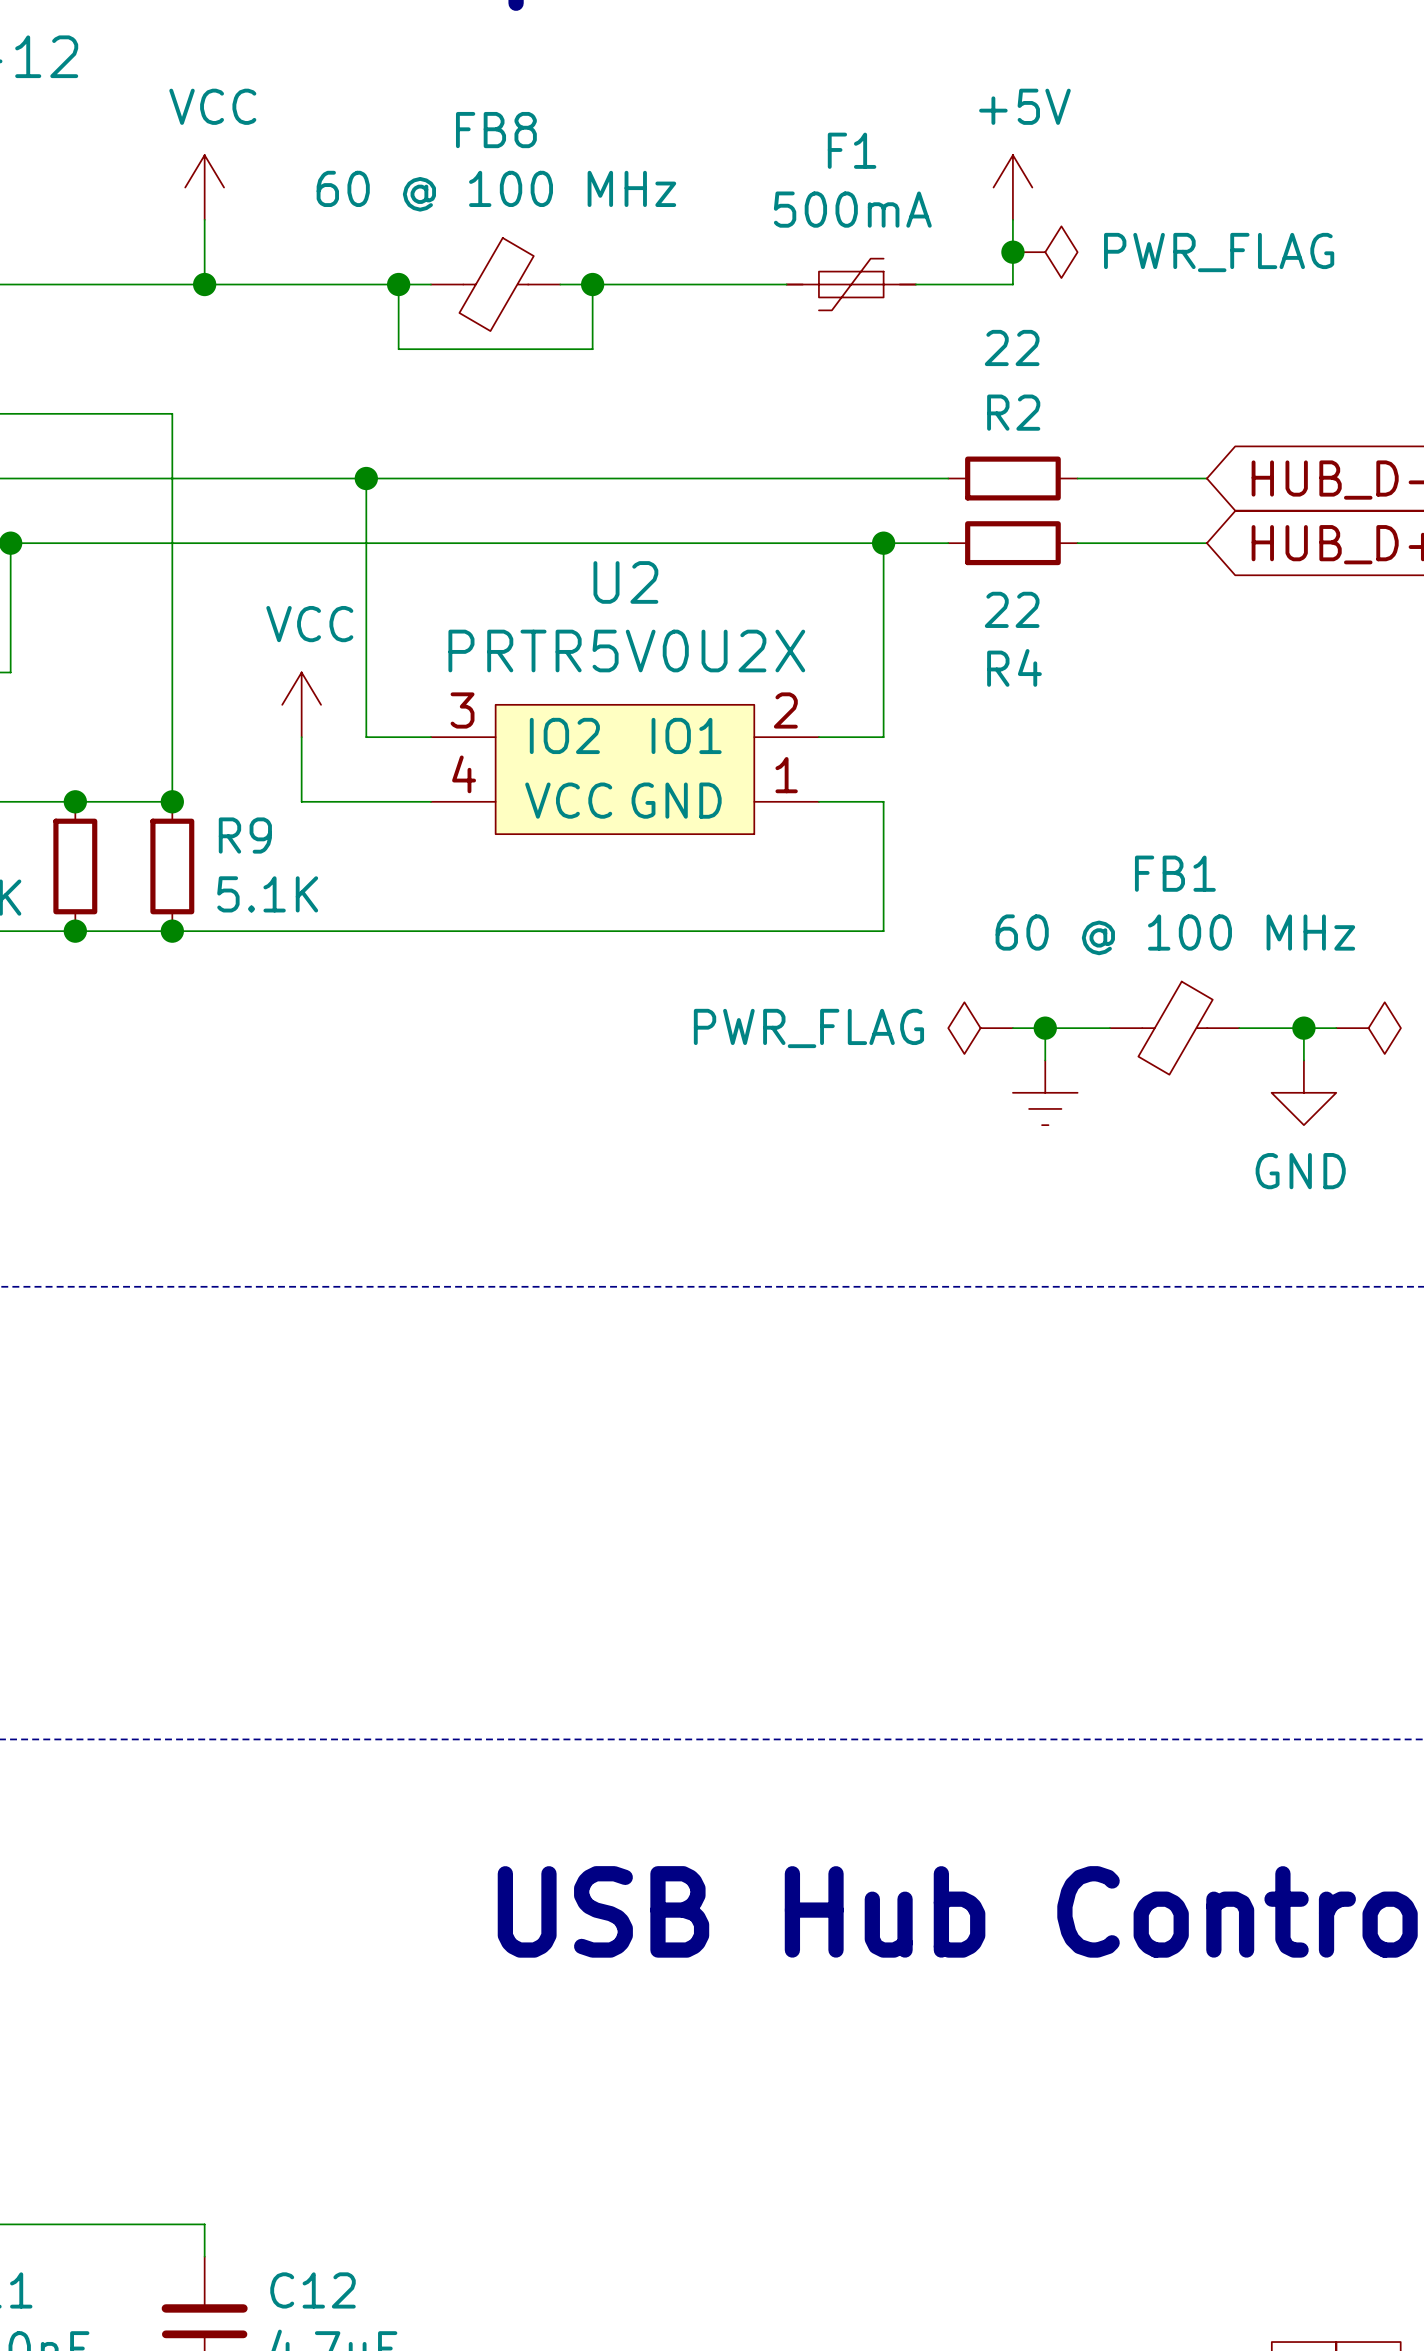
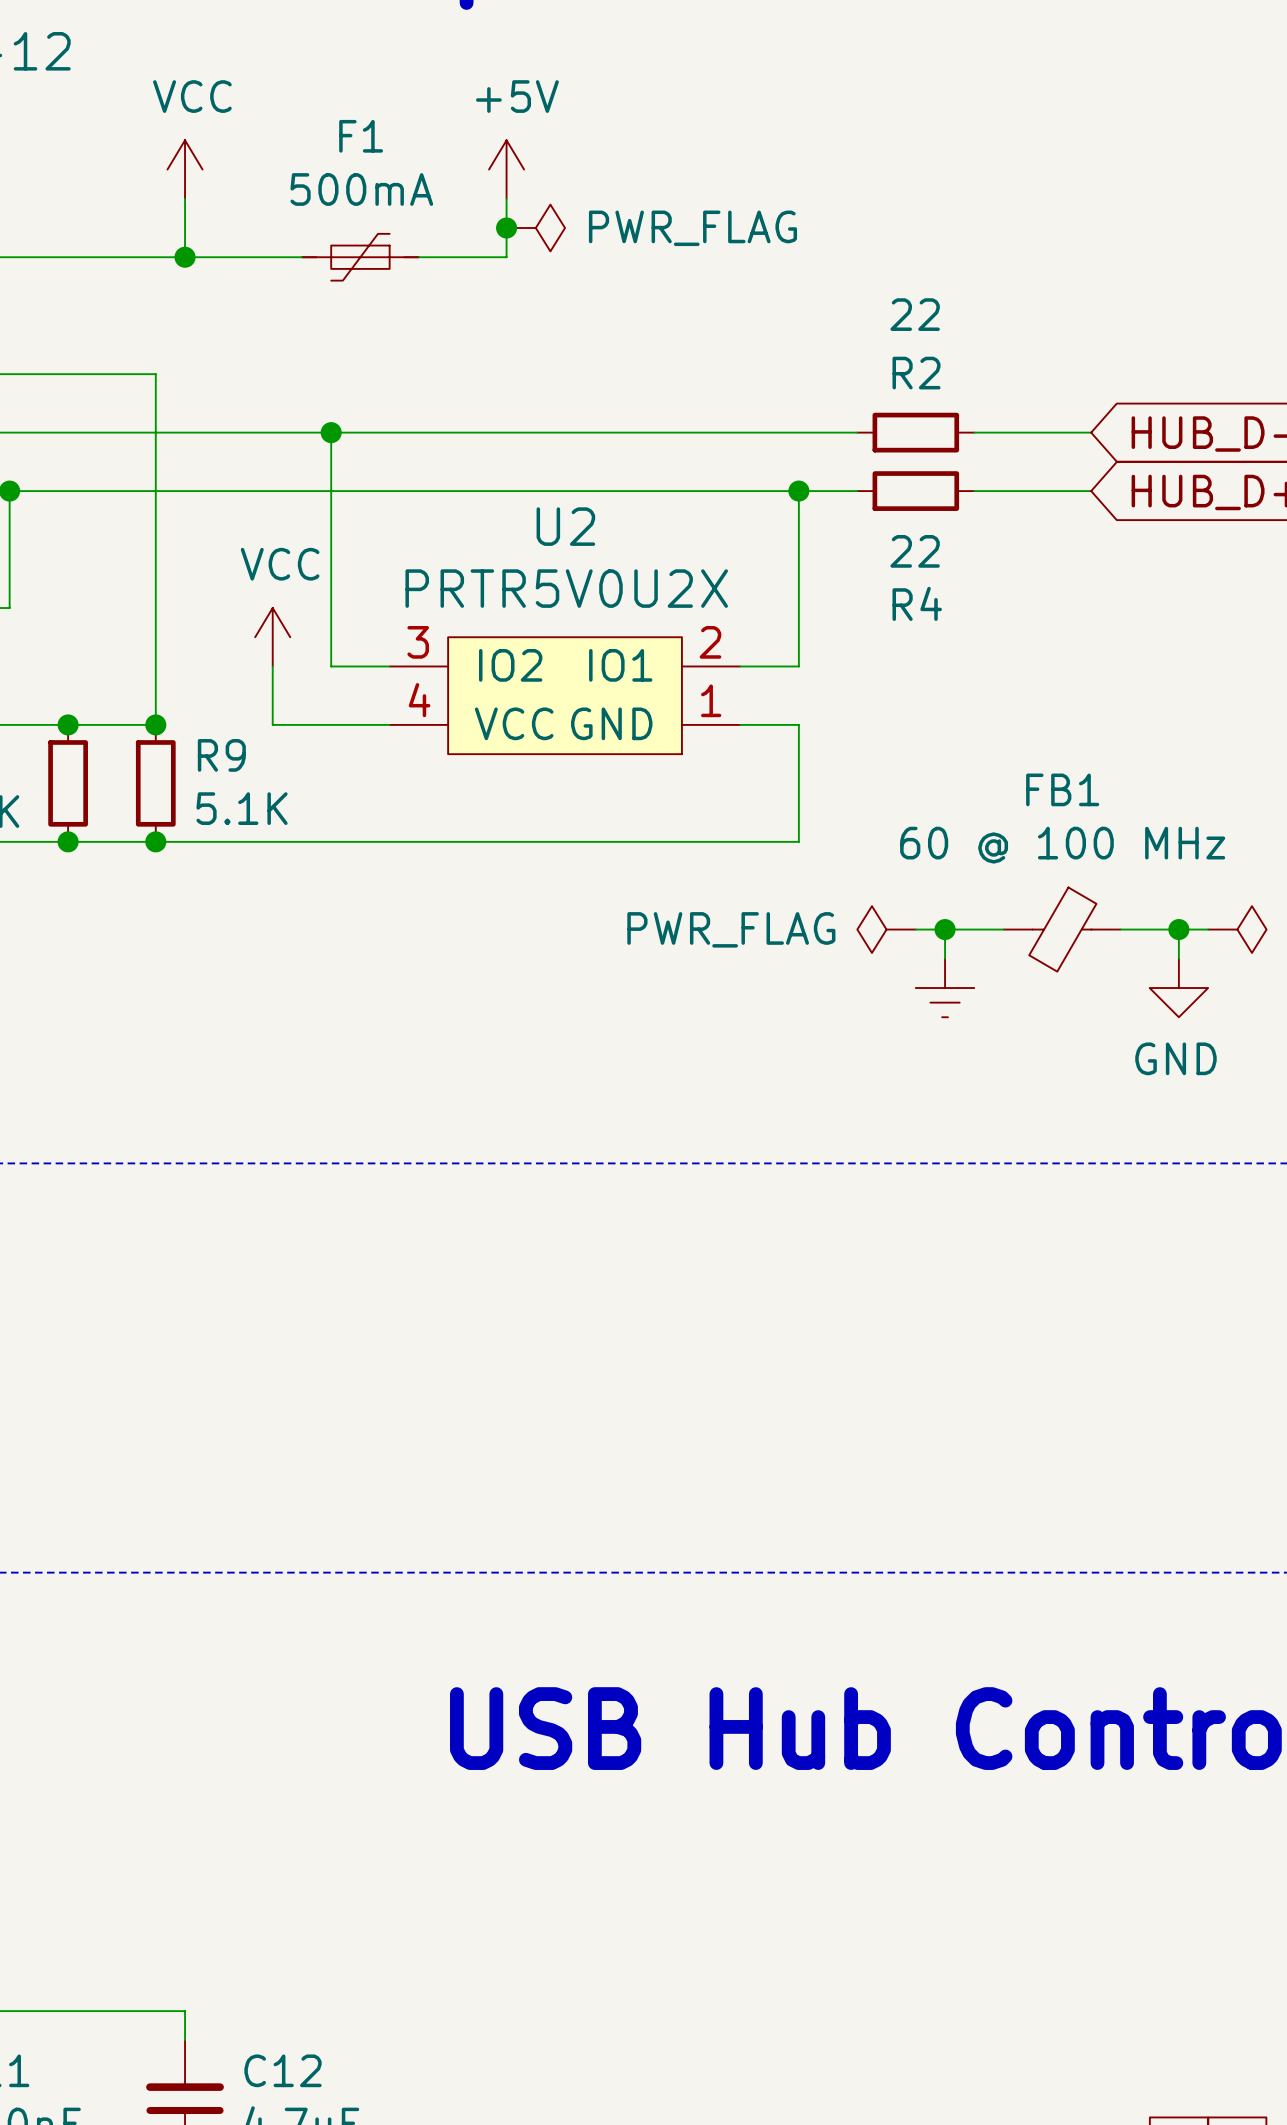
power symbol position: +5V (1012, 187) -> +5V (506, 169)
wire: (1012, 219) (1012, 284) (915, 284) -> (506, 198) (506, 257) (418, 257)
junction: (1012, 252) -> none
power symbol position: PWR_FLAG (1045, 252) -> PWR_FLAG (535, 228)
wire: (398, 284) (398, 349) (592, 349) (592, 284) -> none
junction: (398, 284) -> none
FB8: 60 @ 100 MHz (495, 284) -> none
wire: (560, 284) (786, 284) -> none
junction position: (592, 284) -> (506, 228)
F1 position: (851, 284) -> (360, 257)

